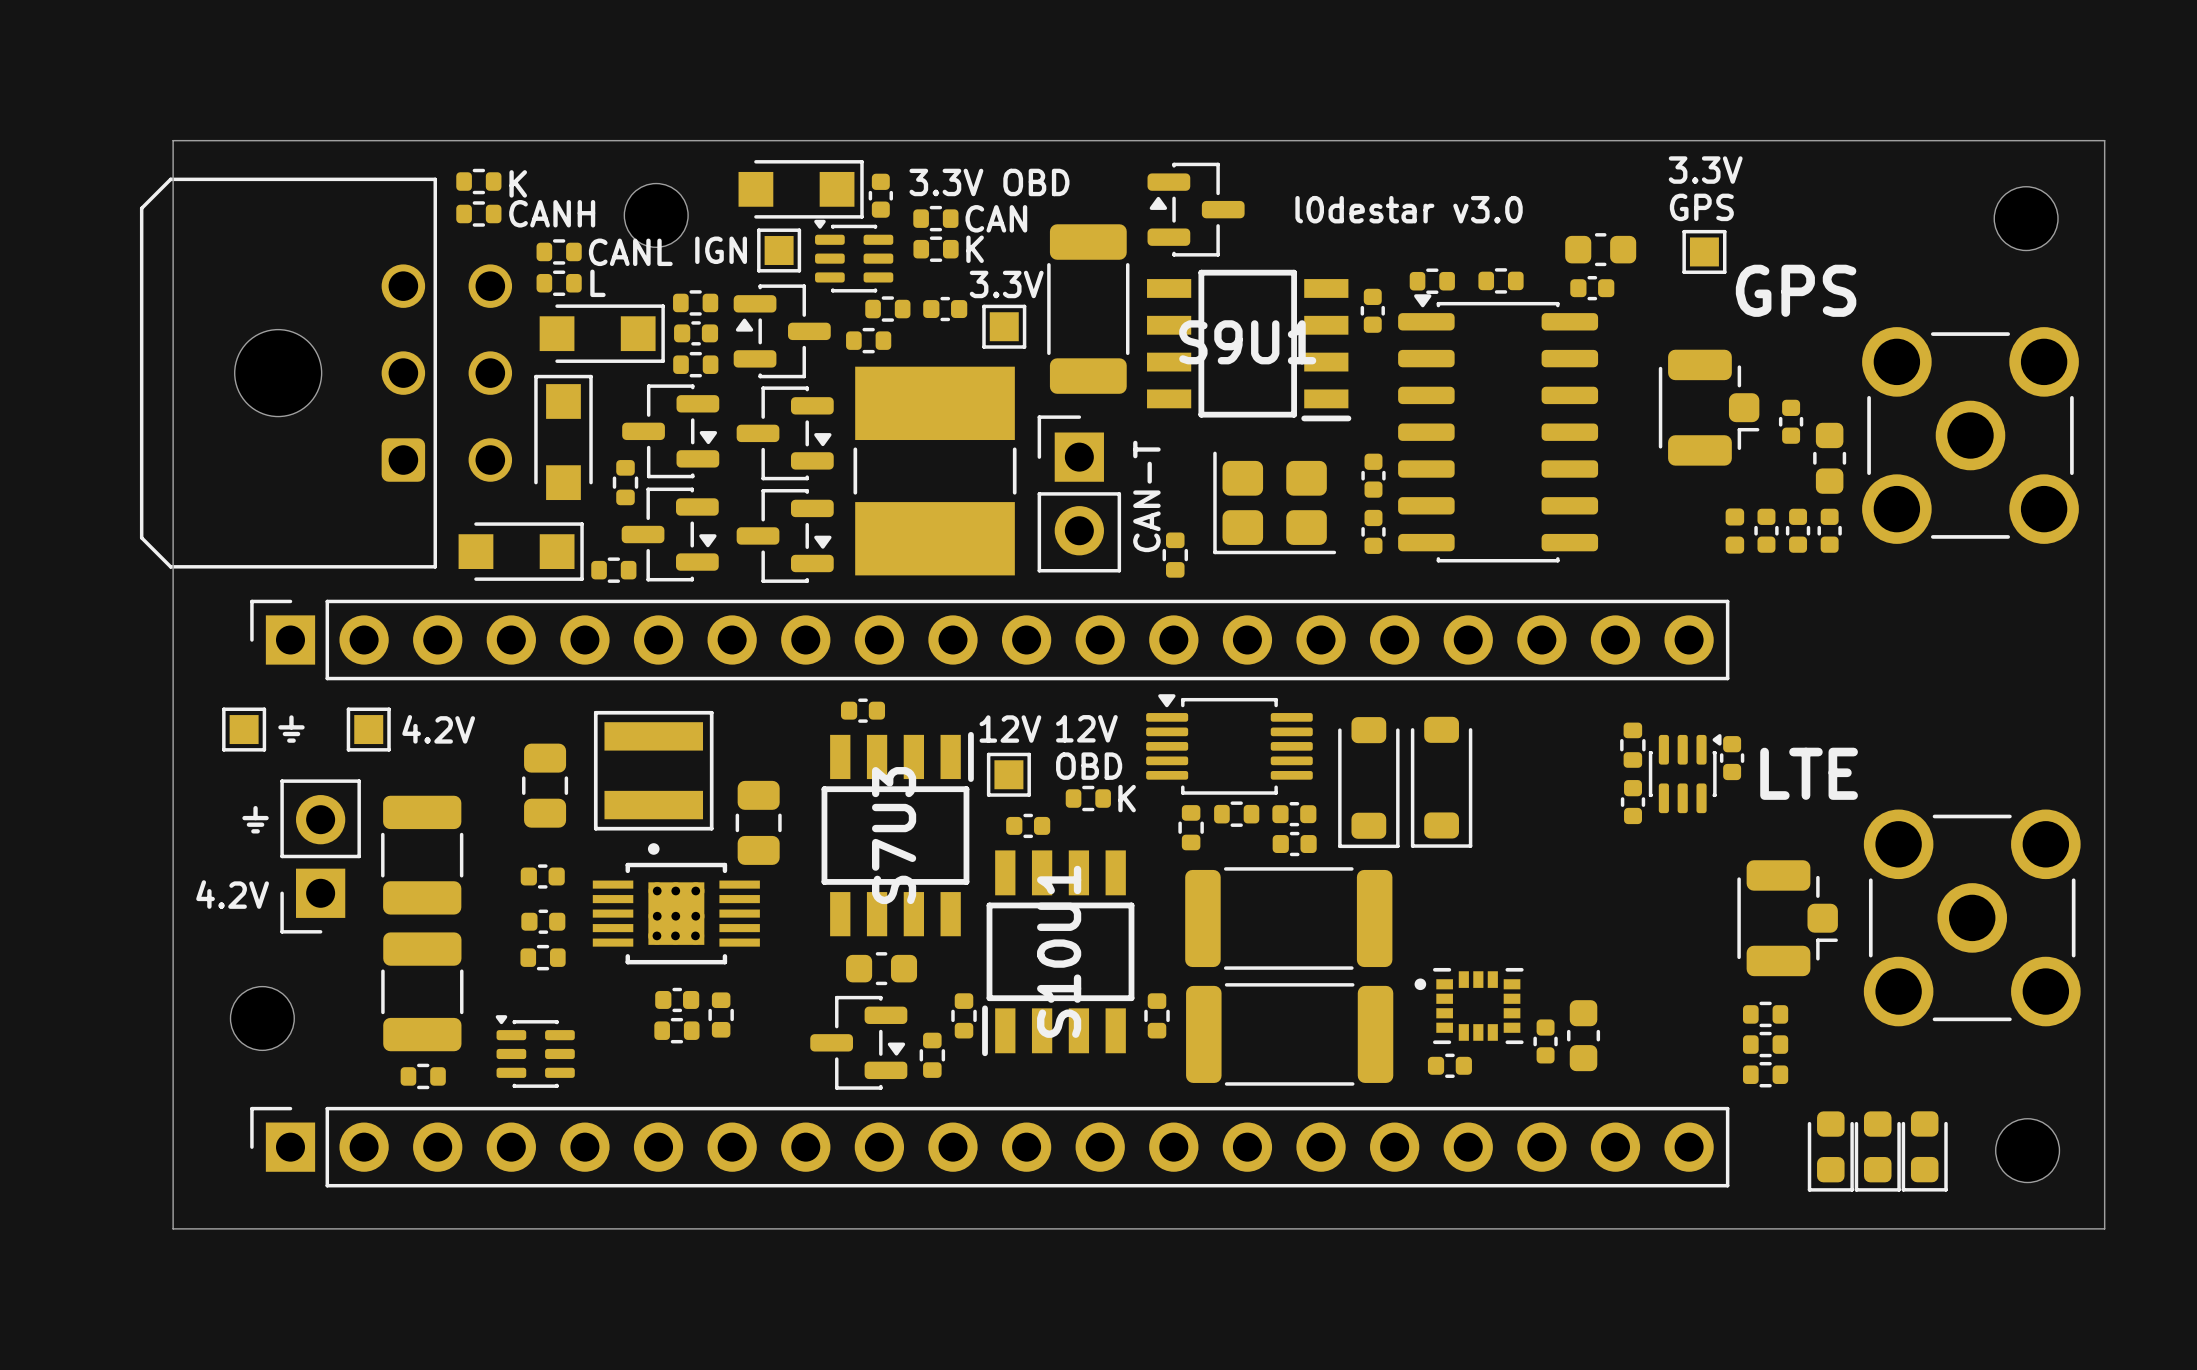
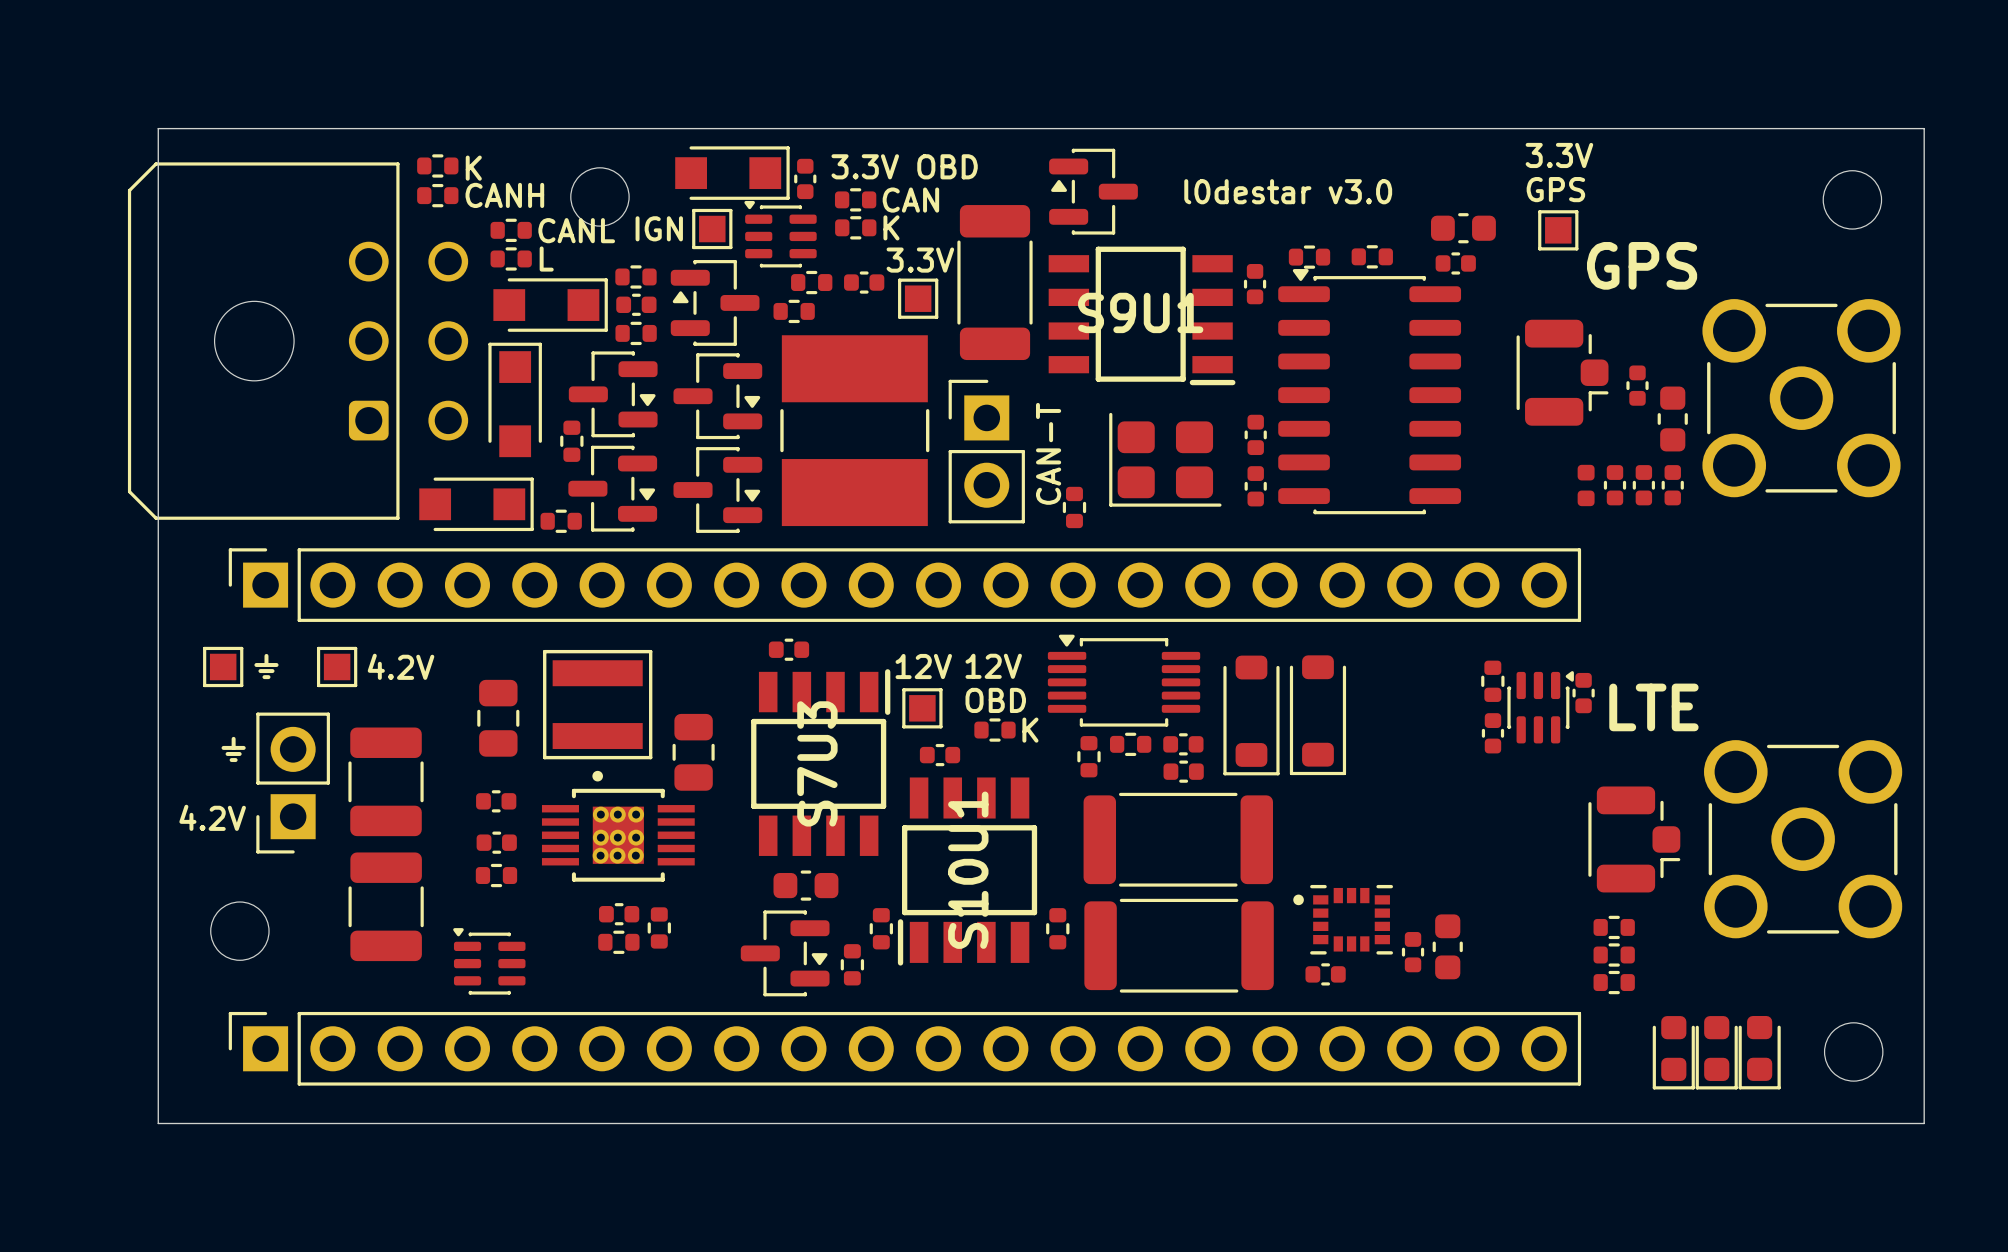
part: (423, 1076) -> none

